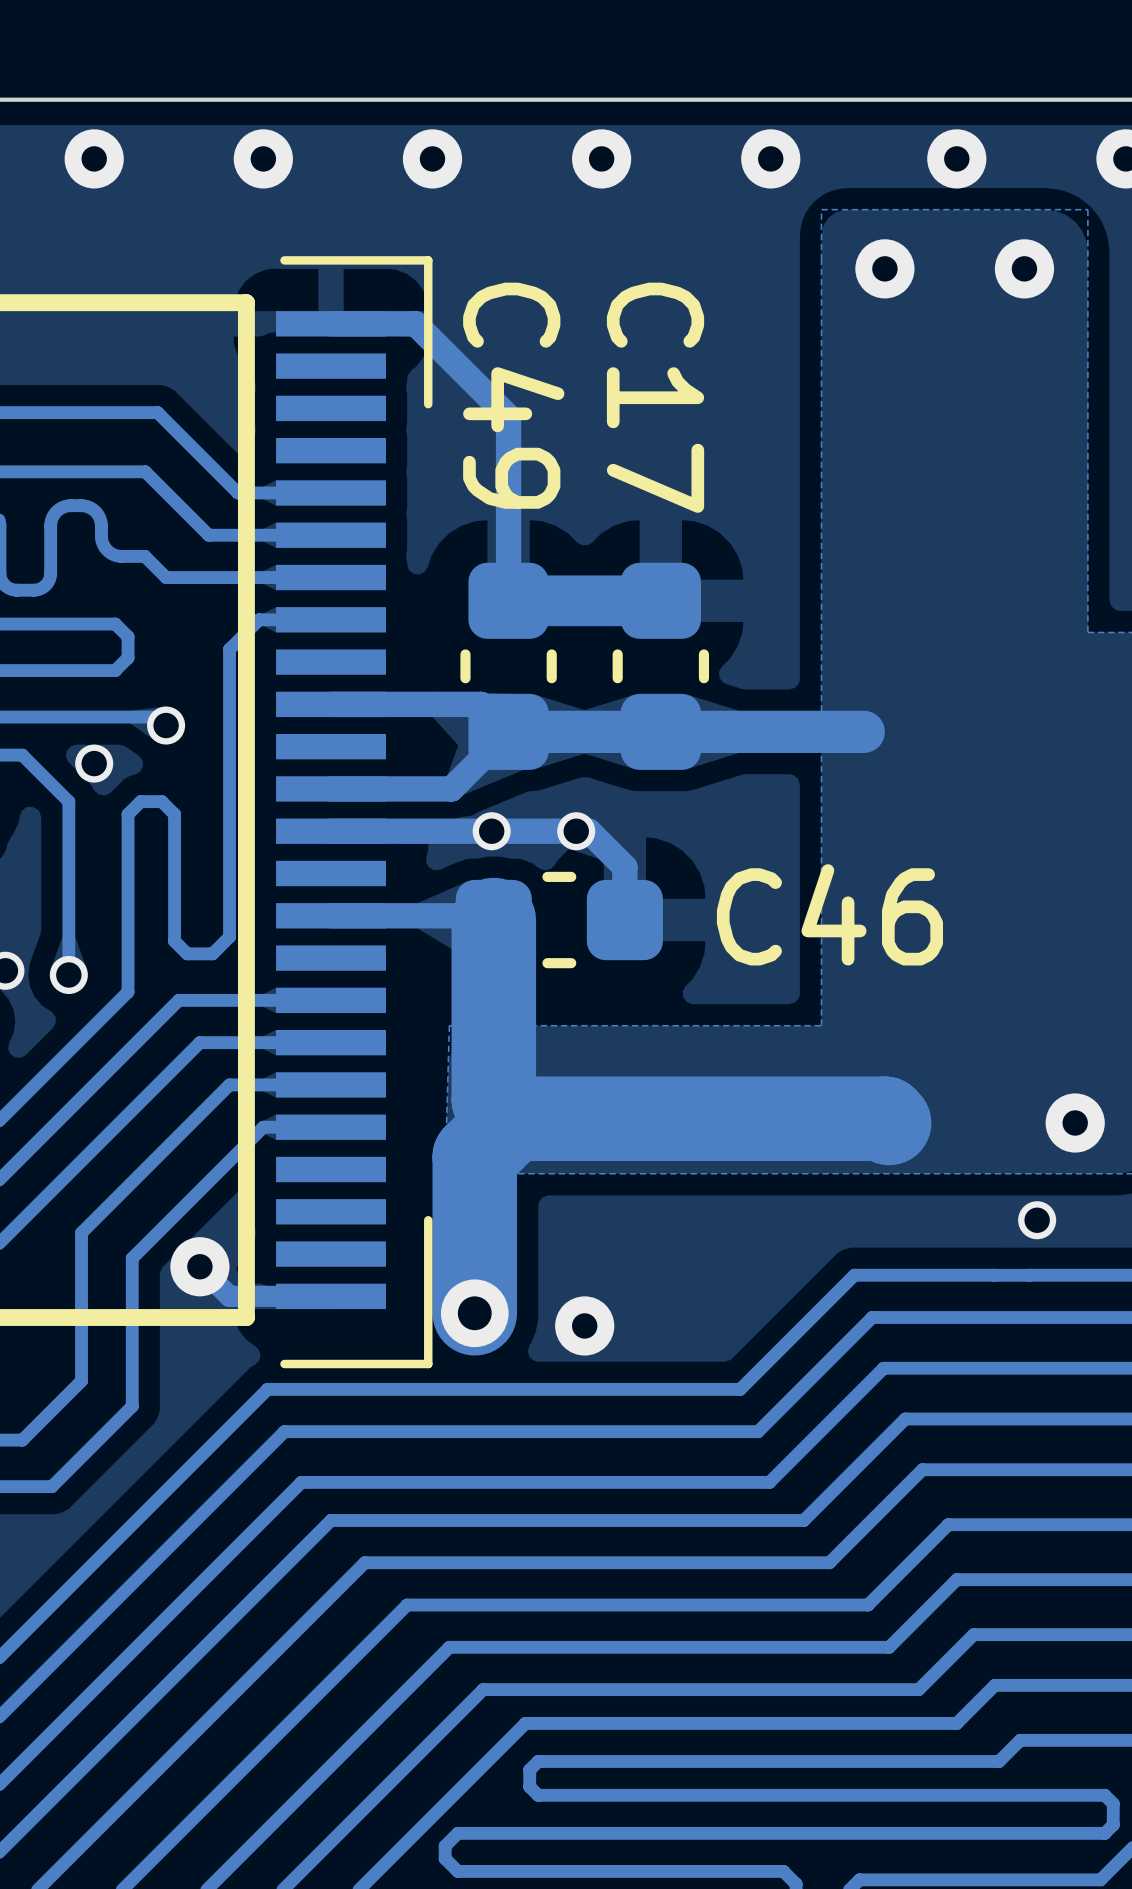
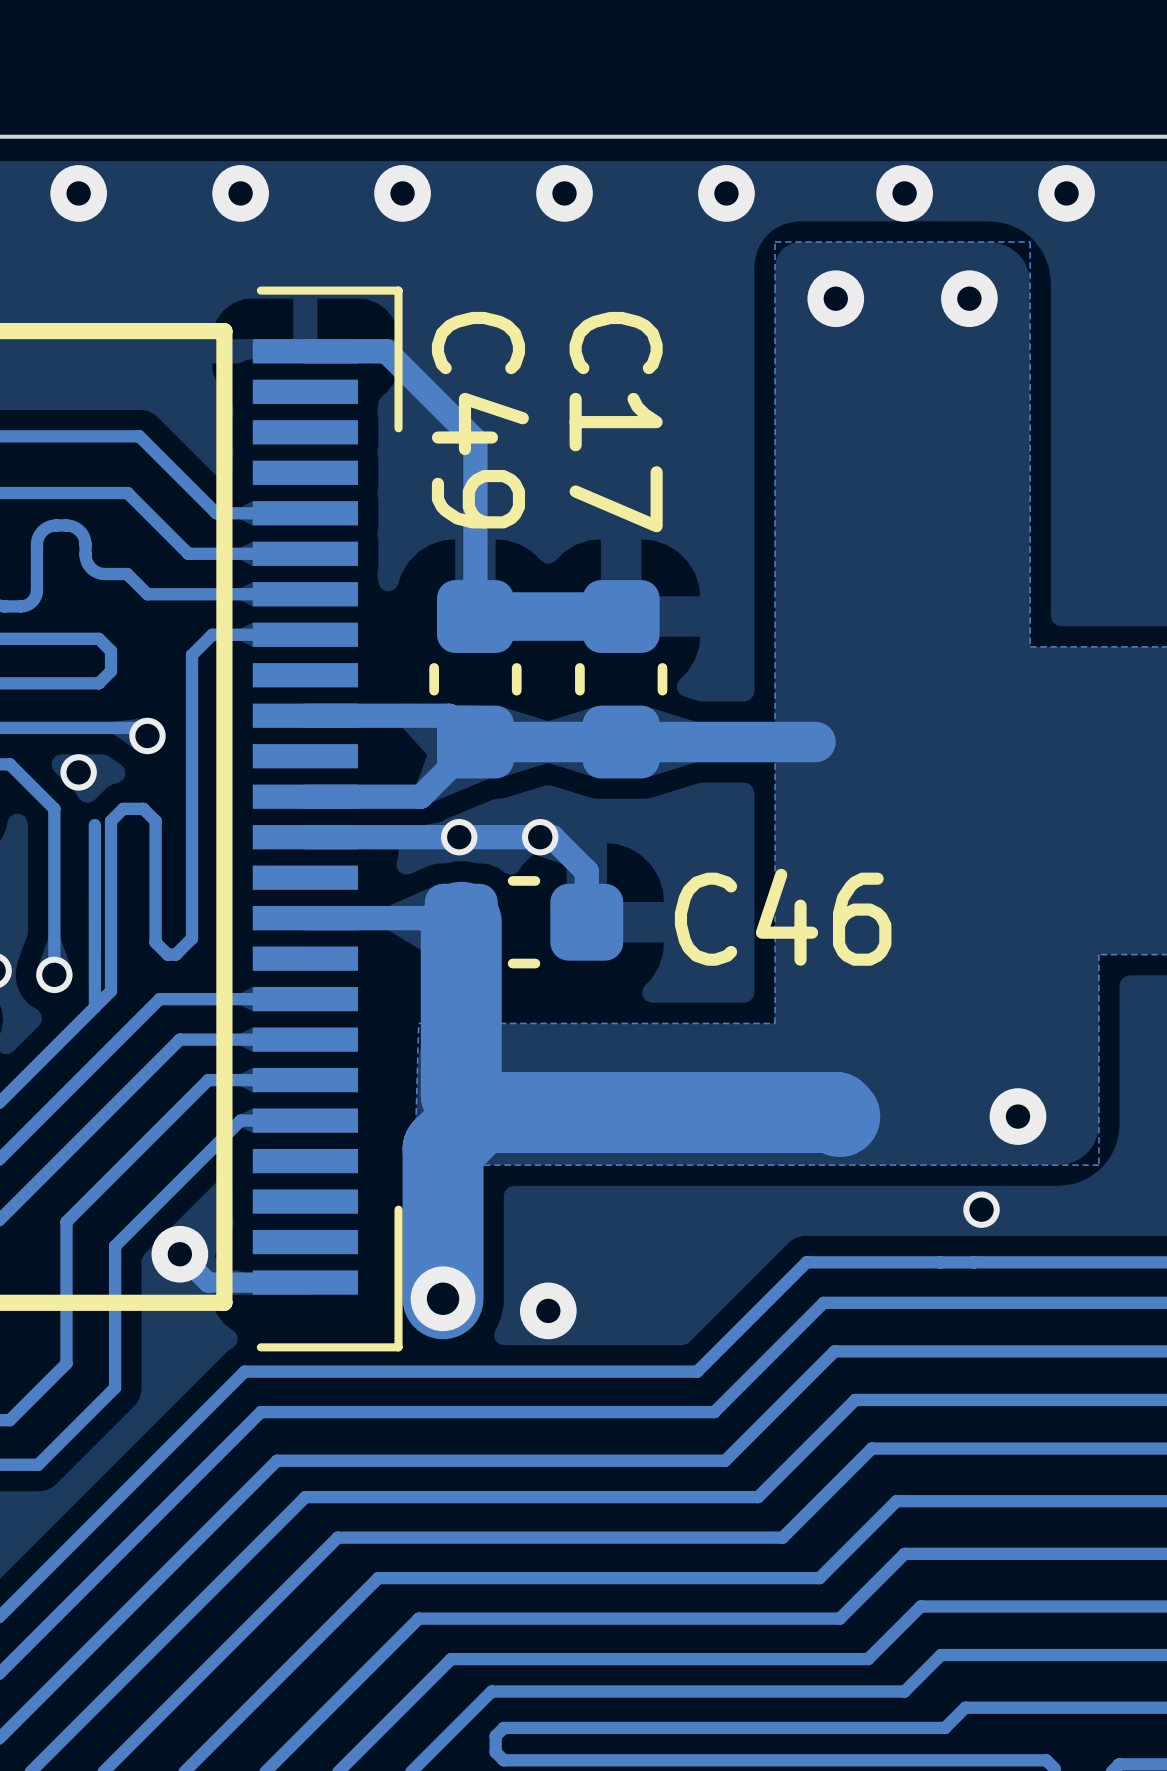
track: (259, 619) (229, 649) (229, 936) (212, 953) (195, 953) -> (236, 634) (212, 634) (192, 655) (192, 938) (175, 954)
track: none -> (94, 825) (94, 1007)

